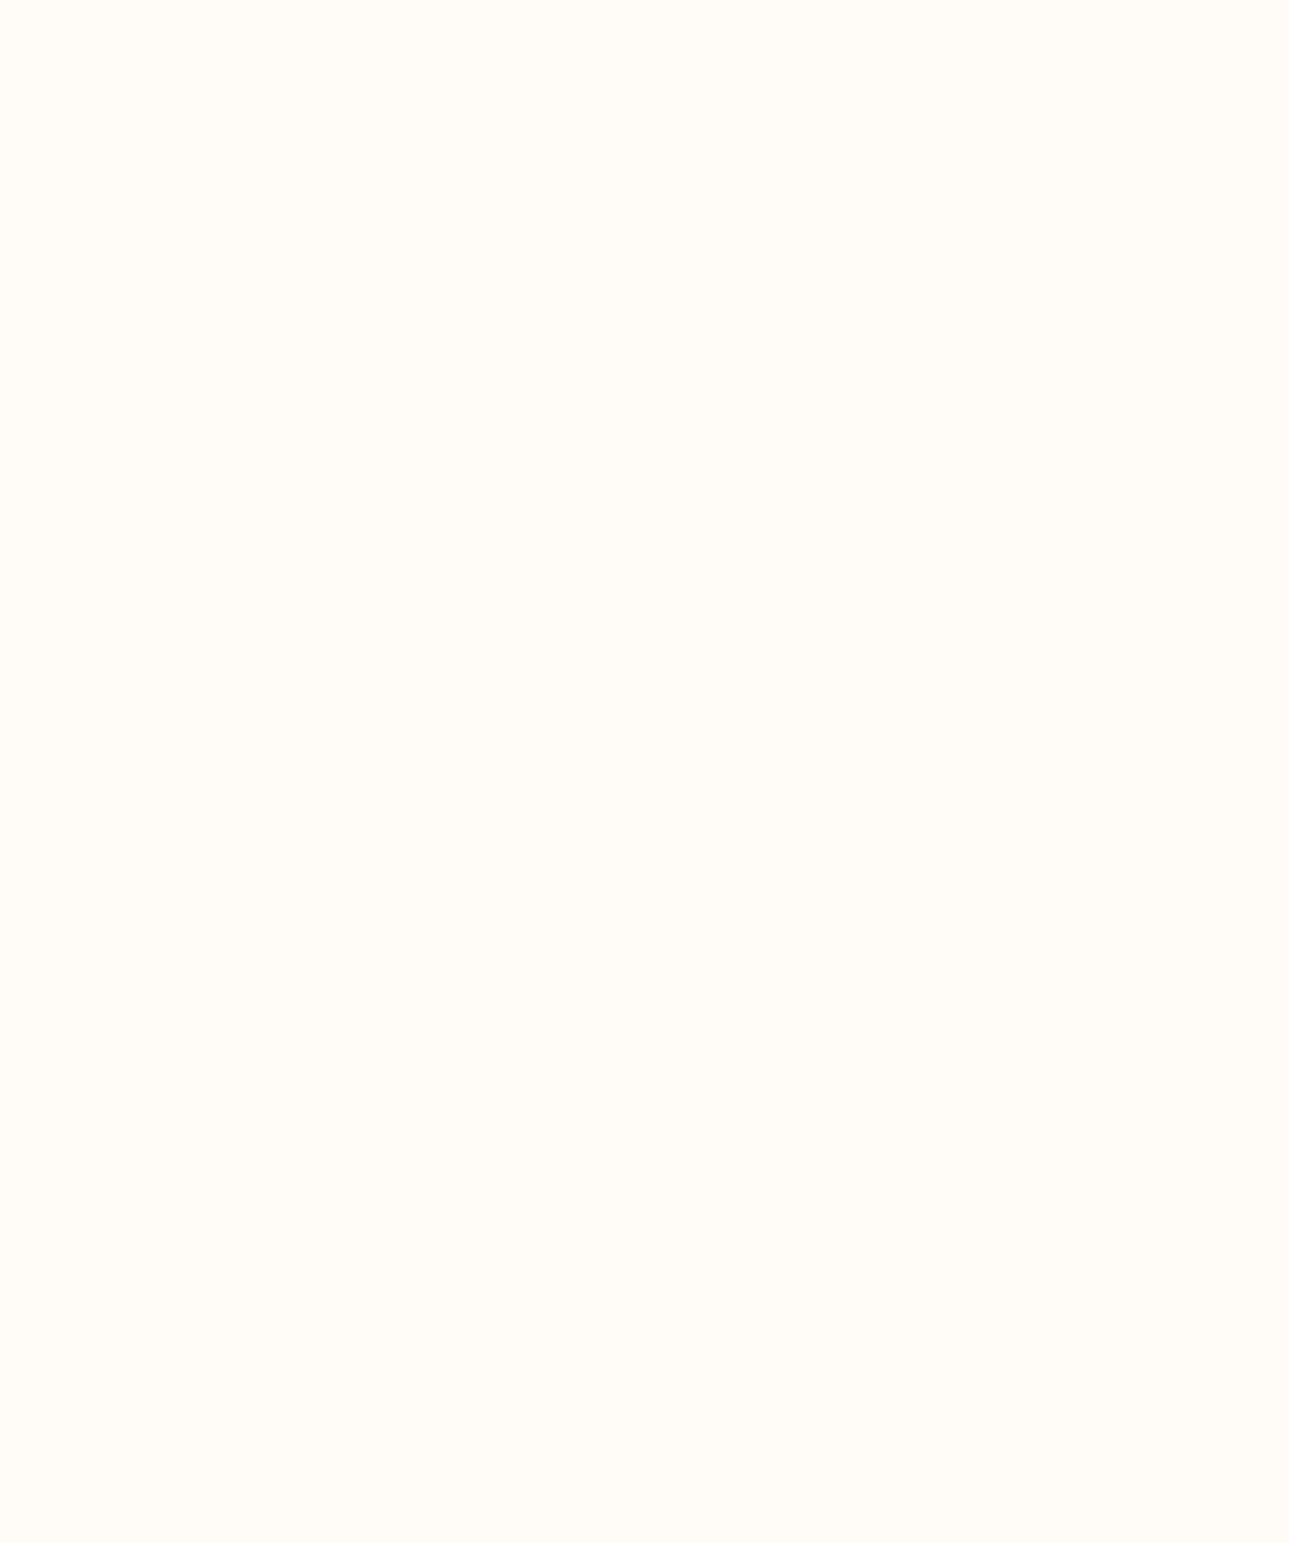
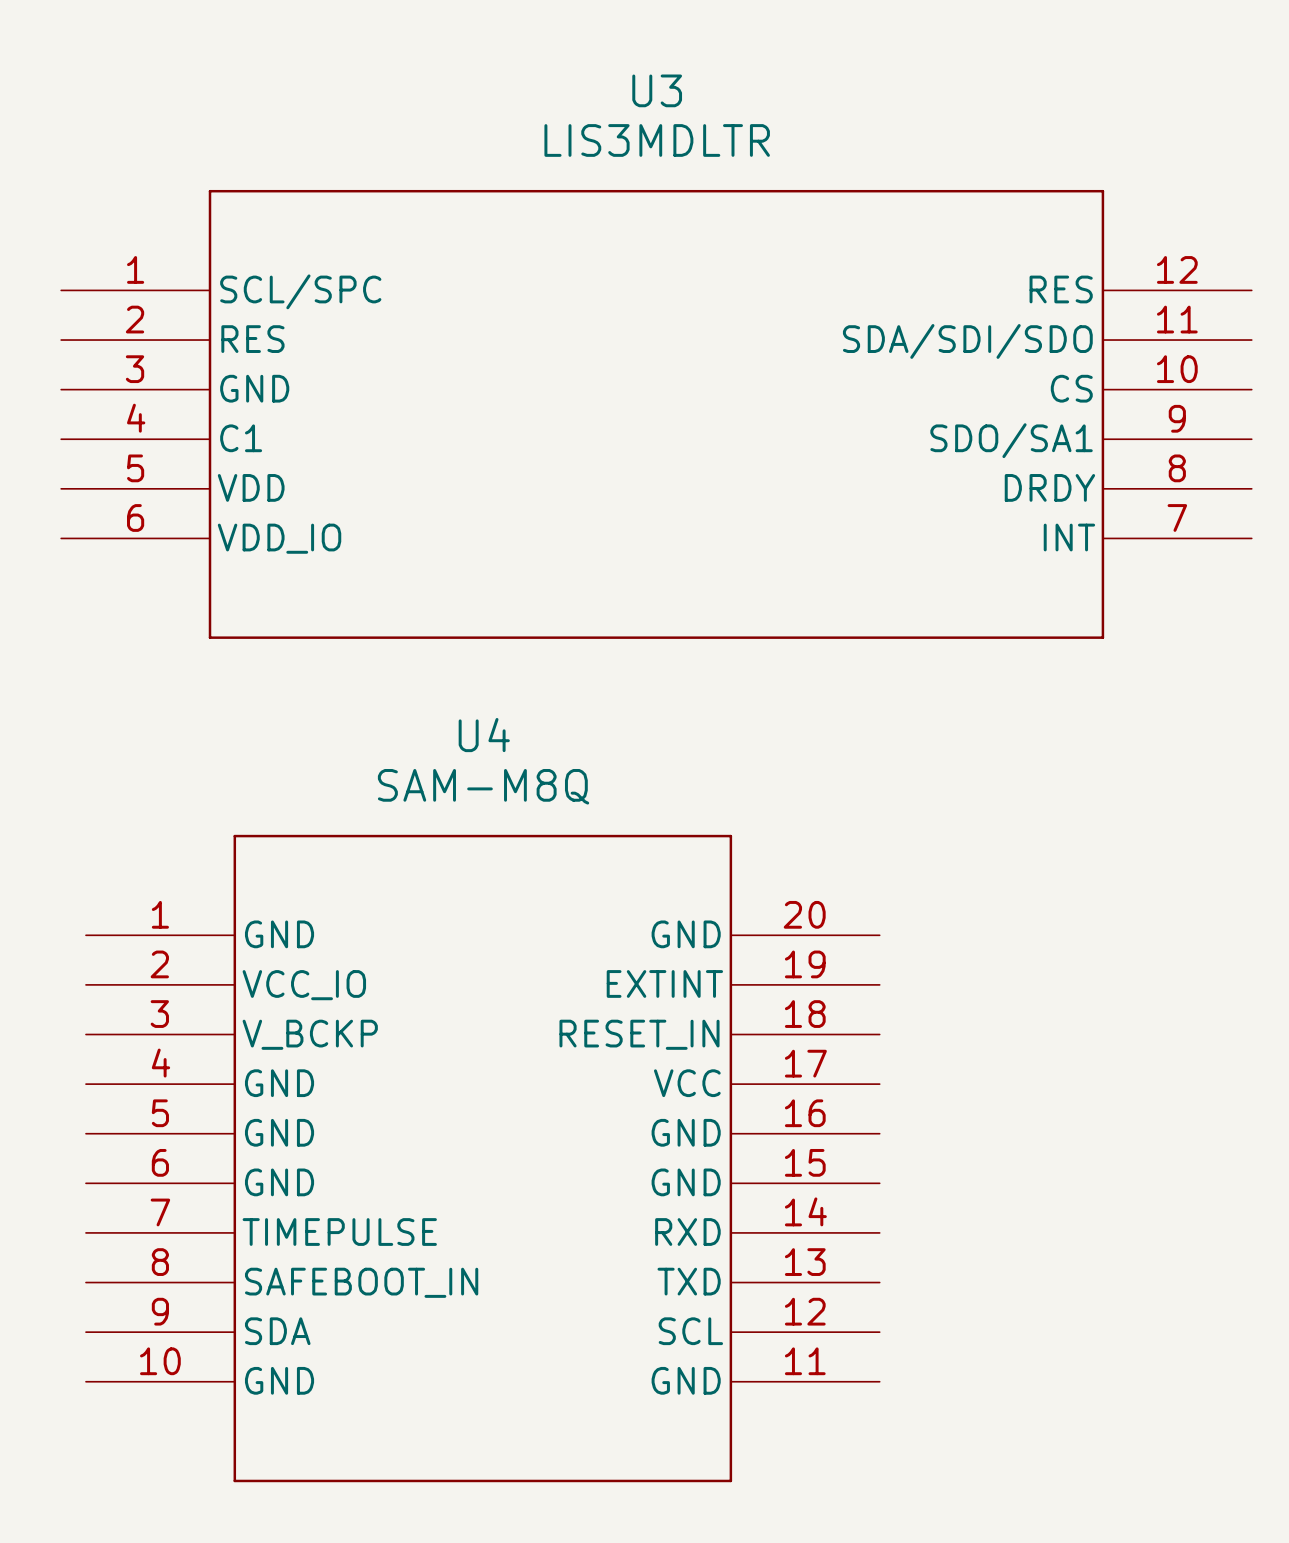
U3: none -> LIS3MDLTR (656, 414)
U4: none -> SAM-M8Q (482, 1158)

